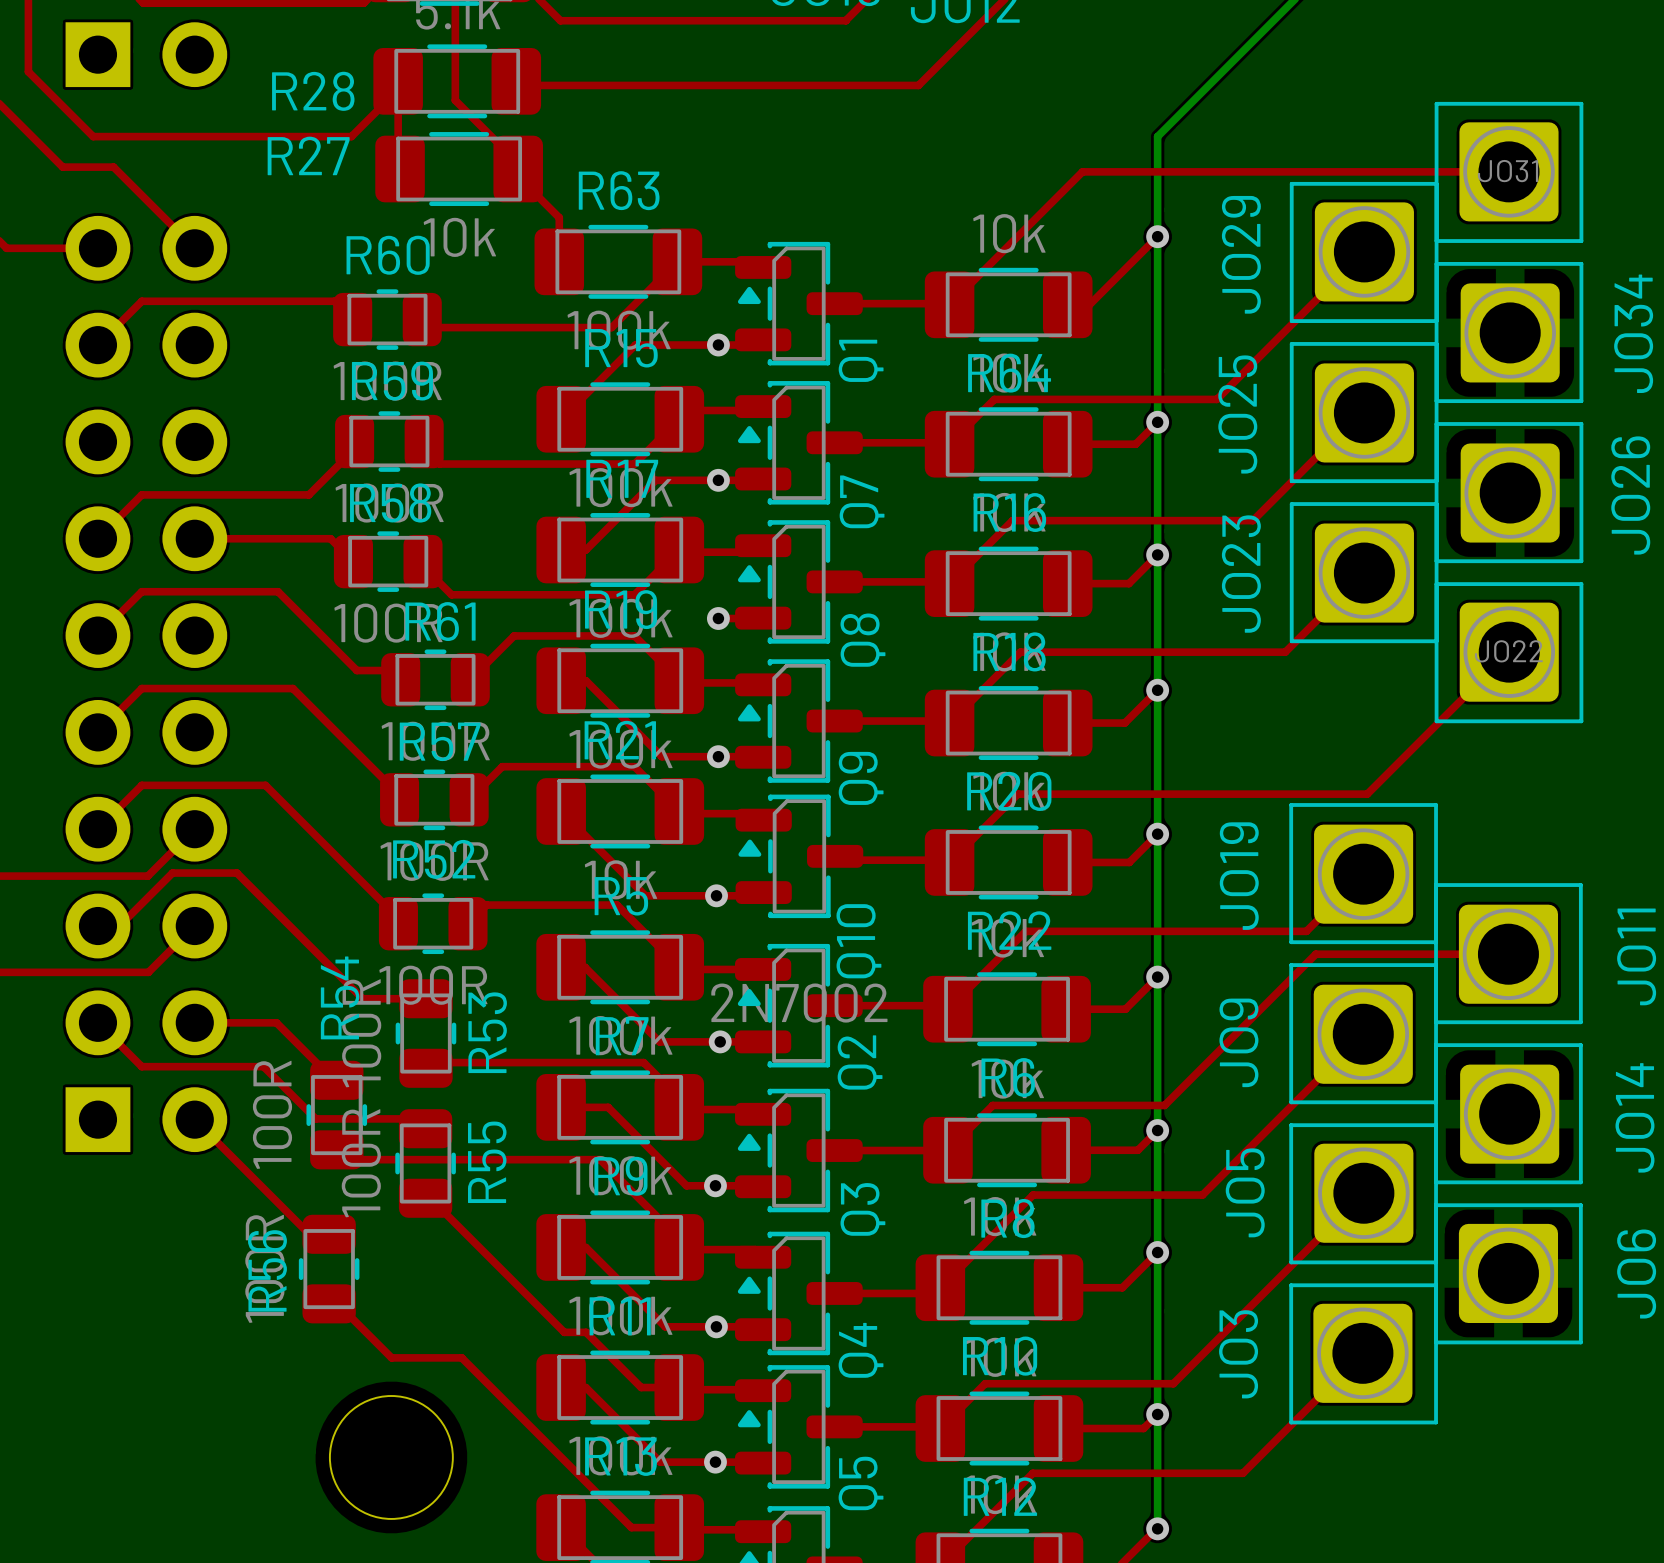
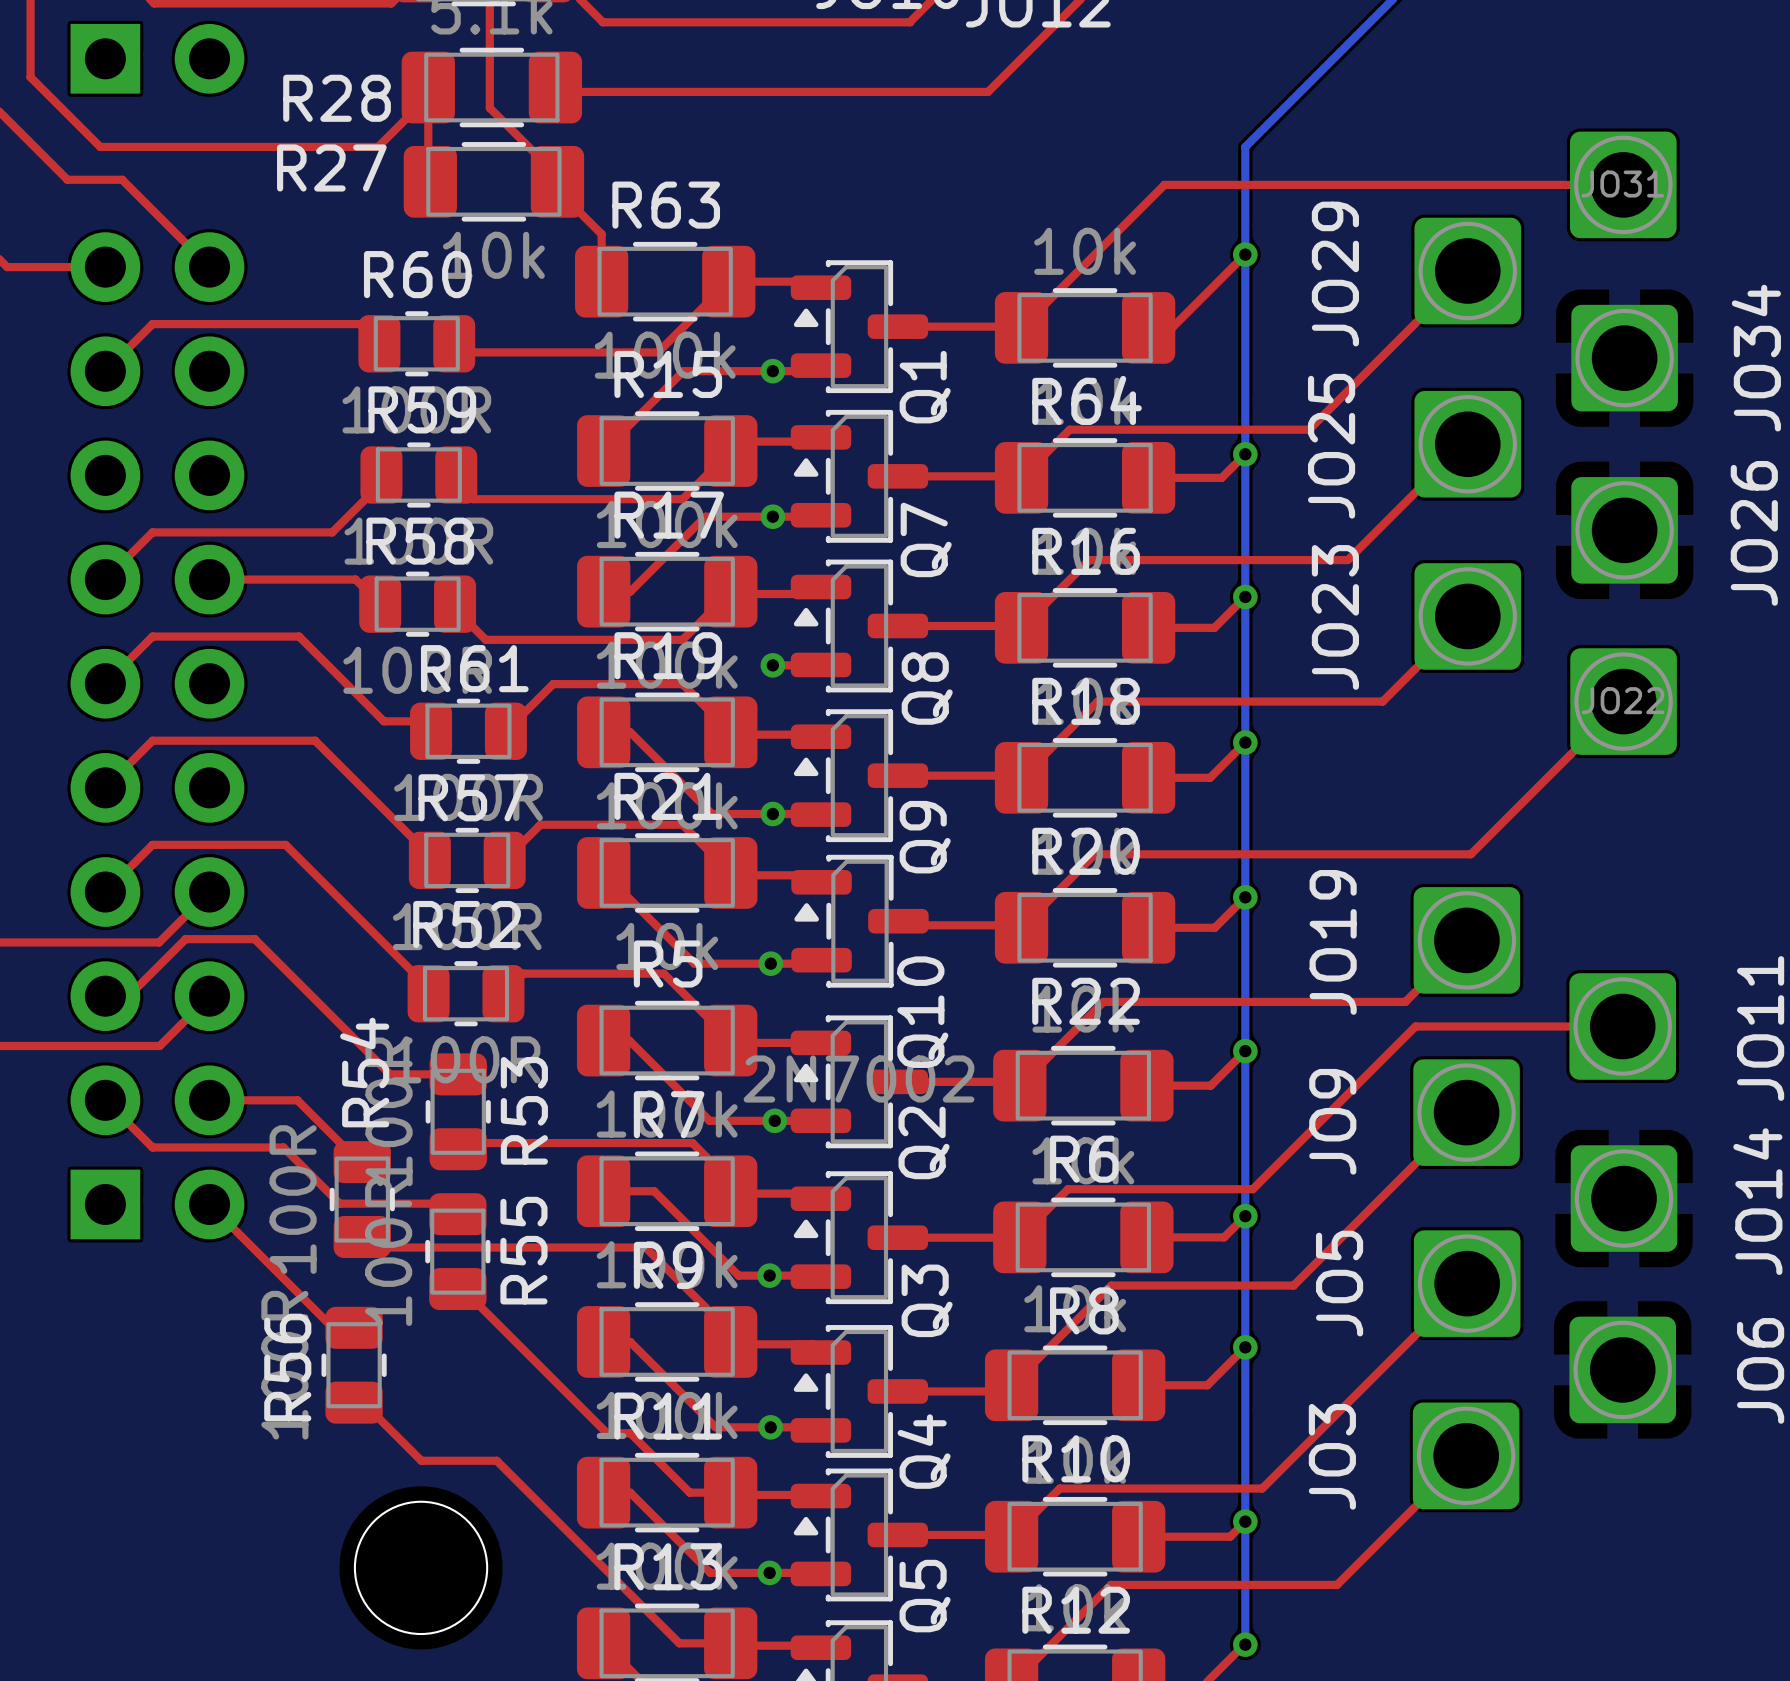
line: (1436, 183) (1291, 183) (1291, 321) (1436, 321) -> none
line: (1436, 241) (1581, 241) (1581, 103) (1436, 103) (1436, 721) (1581, 721) (1581, 584) (1436, 584) -> none
line: (1436, 263) (1581, 263) (1581, 401) (1436, 401) -> none
line: (1436, 343) (1291, 343) (1291, 481) (1436, 481) -> none
line: (1436, 423) (1581, 423) (1581, 561) (1436, 561) -> none
line: (1436, 504) (1291, 504) (1291, 641) (1436, 641) -> none
line: (1436, 885) (1580, 885) (1580, 1022) (1436, 1022) -> none
line: (1436, 942) (1291, 942) (1291, 804) (1436, 804) (1436, 1422) (1291, 1422) (1291, 1285) (1436, 1285) -> none
line: (1436, 965) (1291, 965) (1291, 1102) (1436, 1102) -> none
line: (1436, 1045) (1580, 1045) (1580, 1182) (1436, 1182) -> none
line: (1436, 1125) (1291, 1125) (1291, 1262) (1436, 1262) -> none
line: (1436, 1205) (1580, 1205) (1580, 1342) (1436, 1342) -> none

